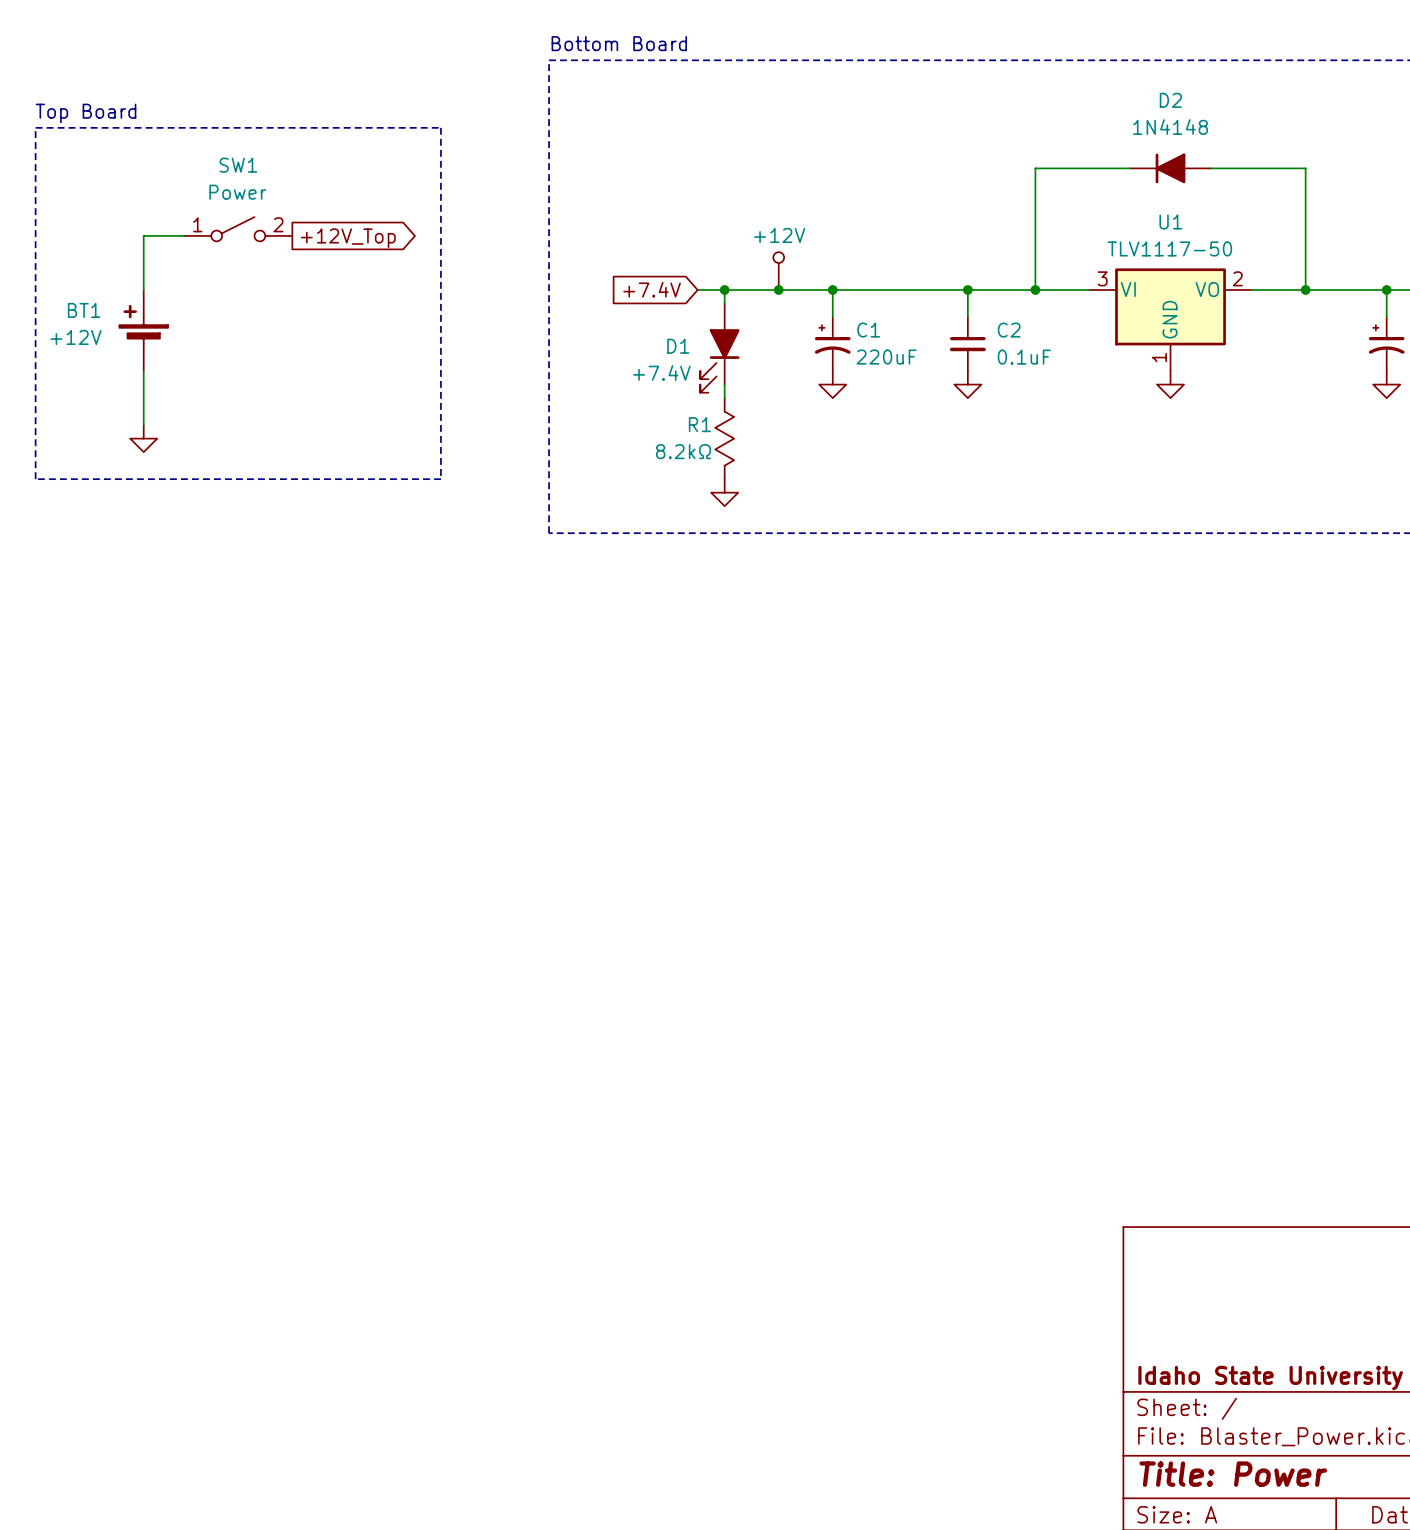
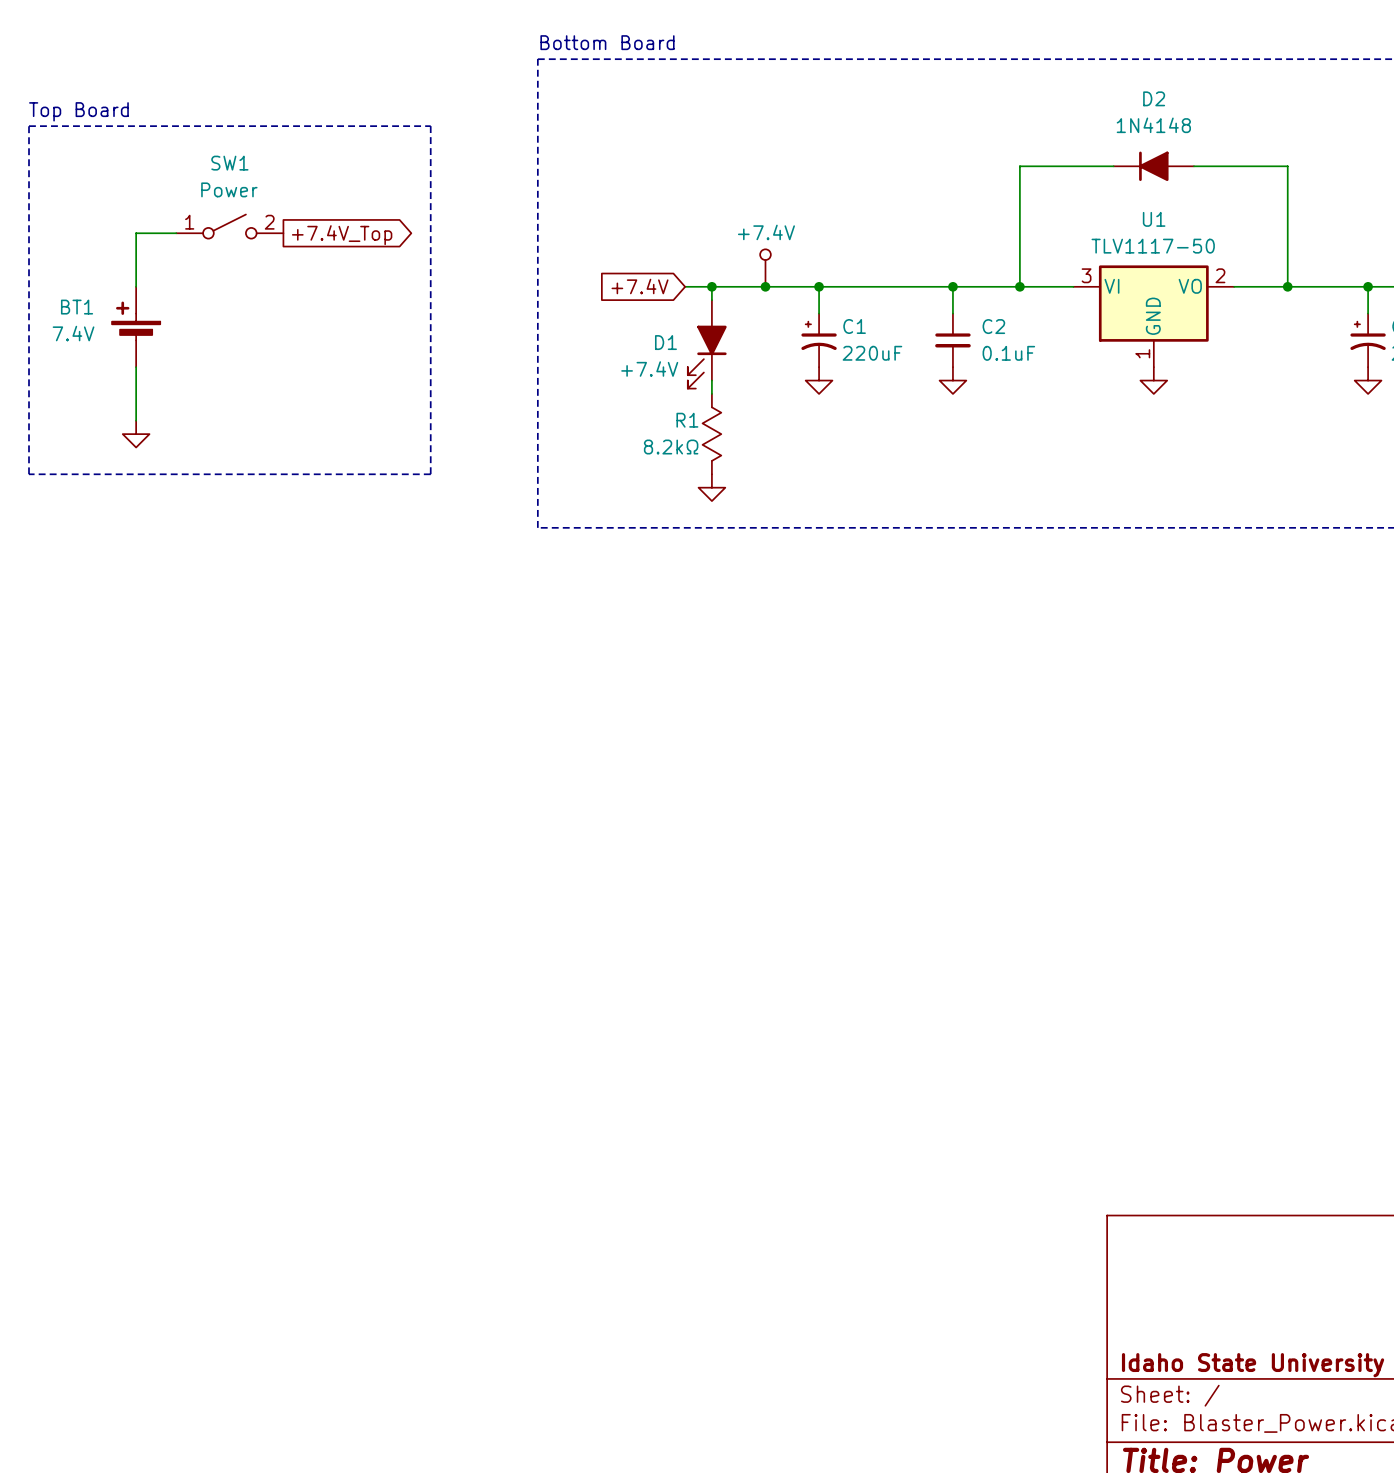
global label: +12V_Top (348, 238) -> +7.4V_Top (342, 235)
power symbol: +12V (778, 271) -> +7.4V (765, 268)
BT1 value: +12V (76, 337) -> 7.4V (73, 333)

